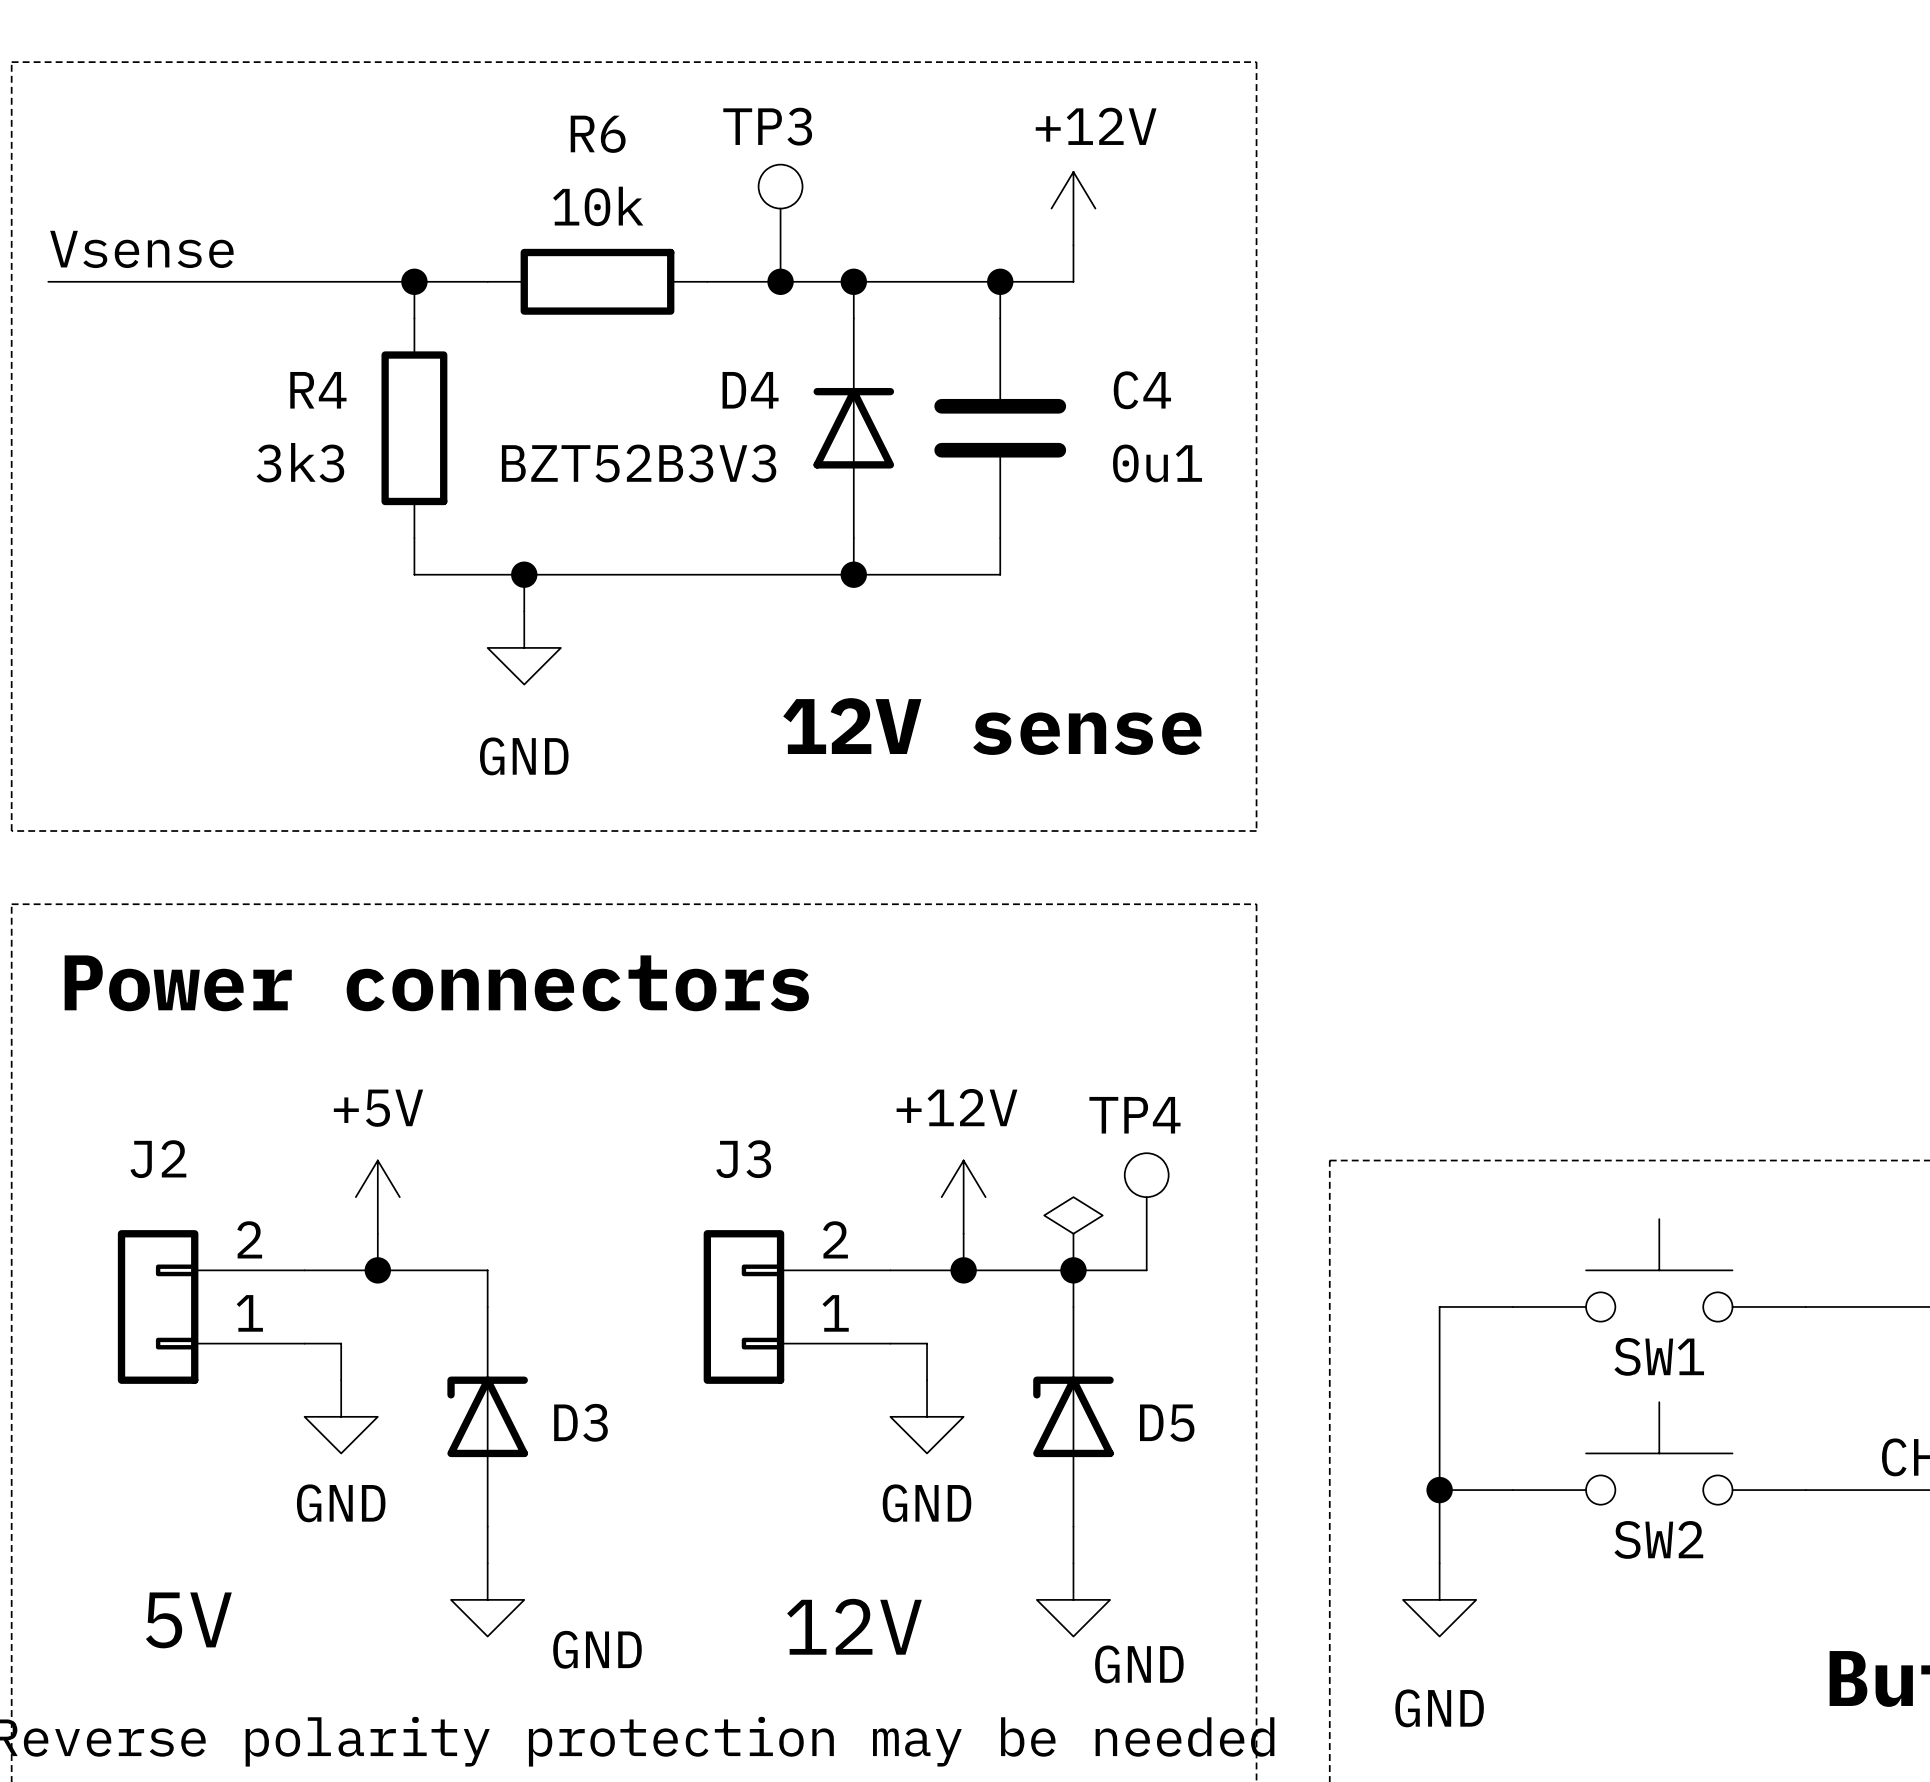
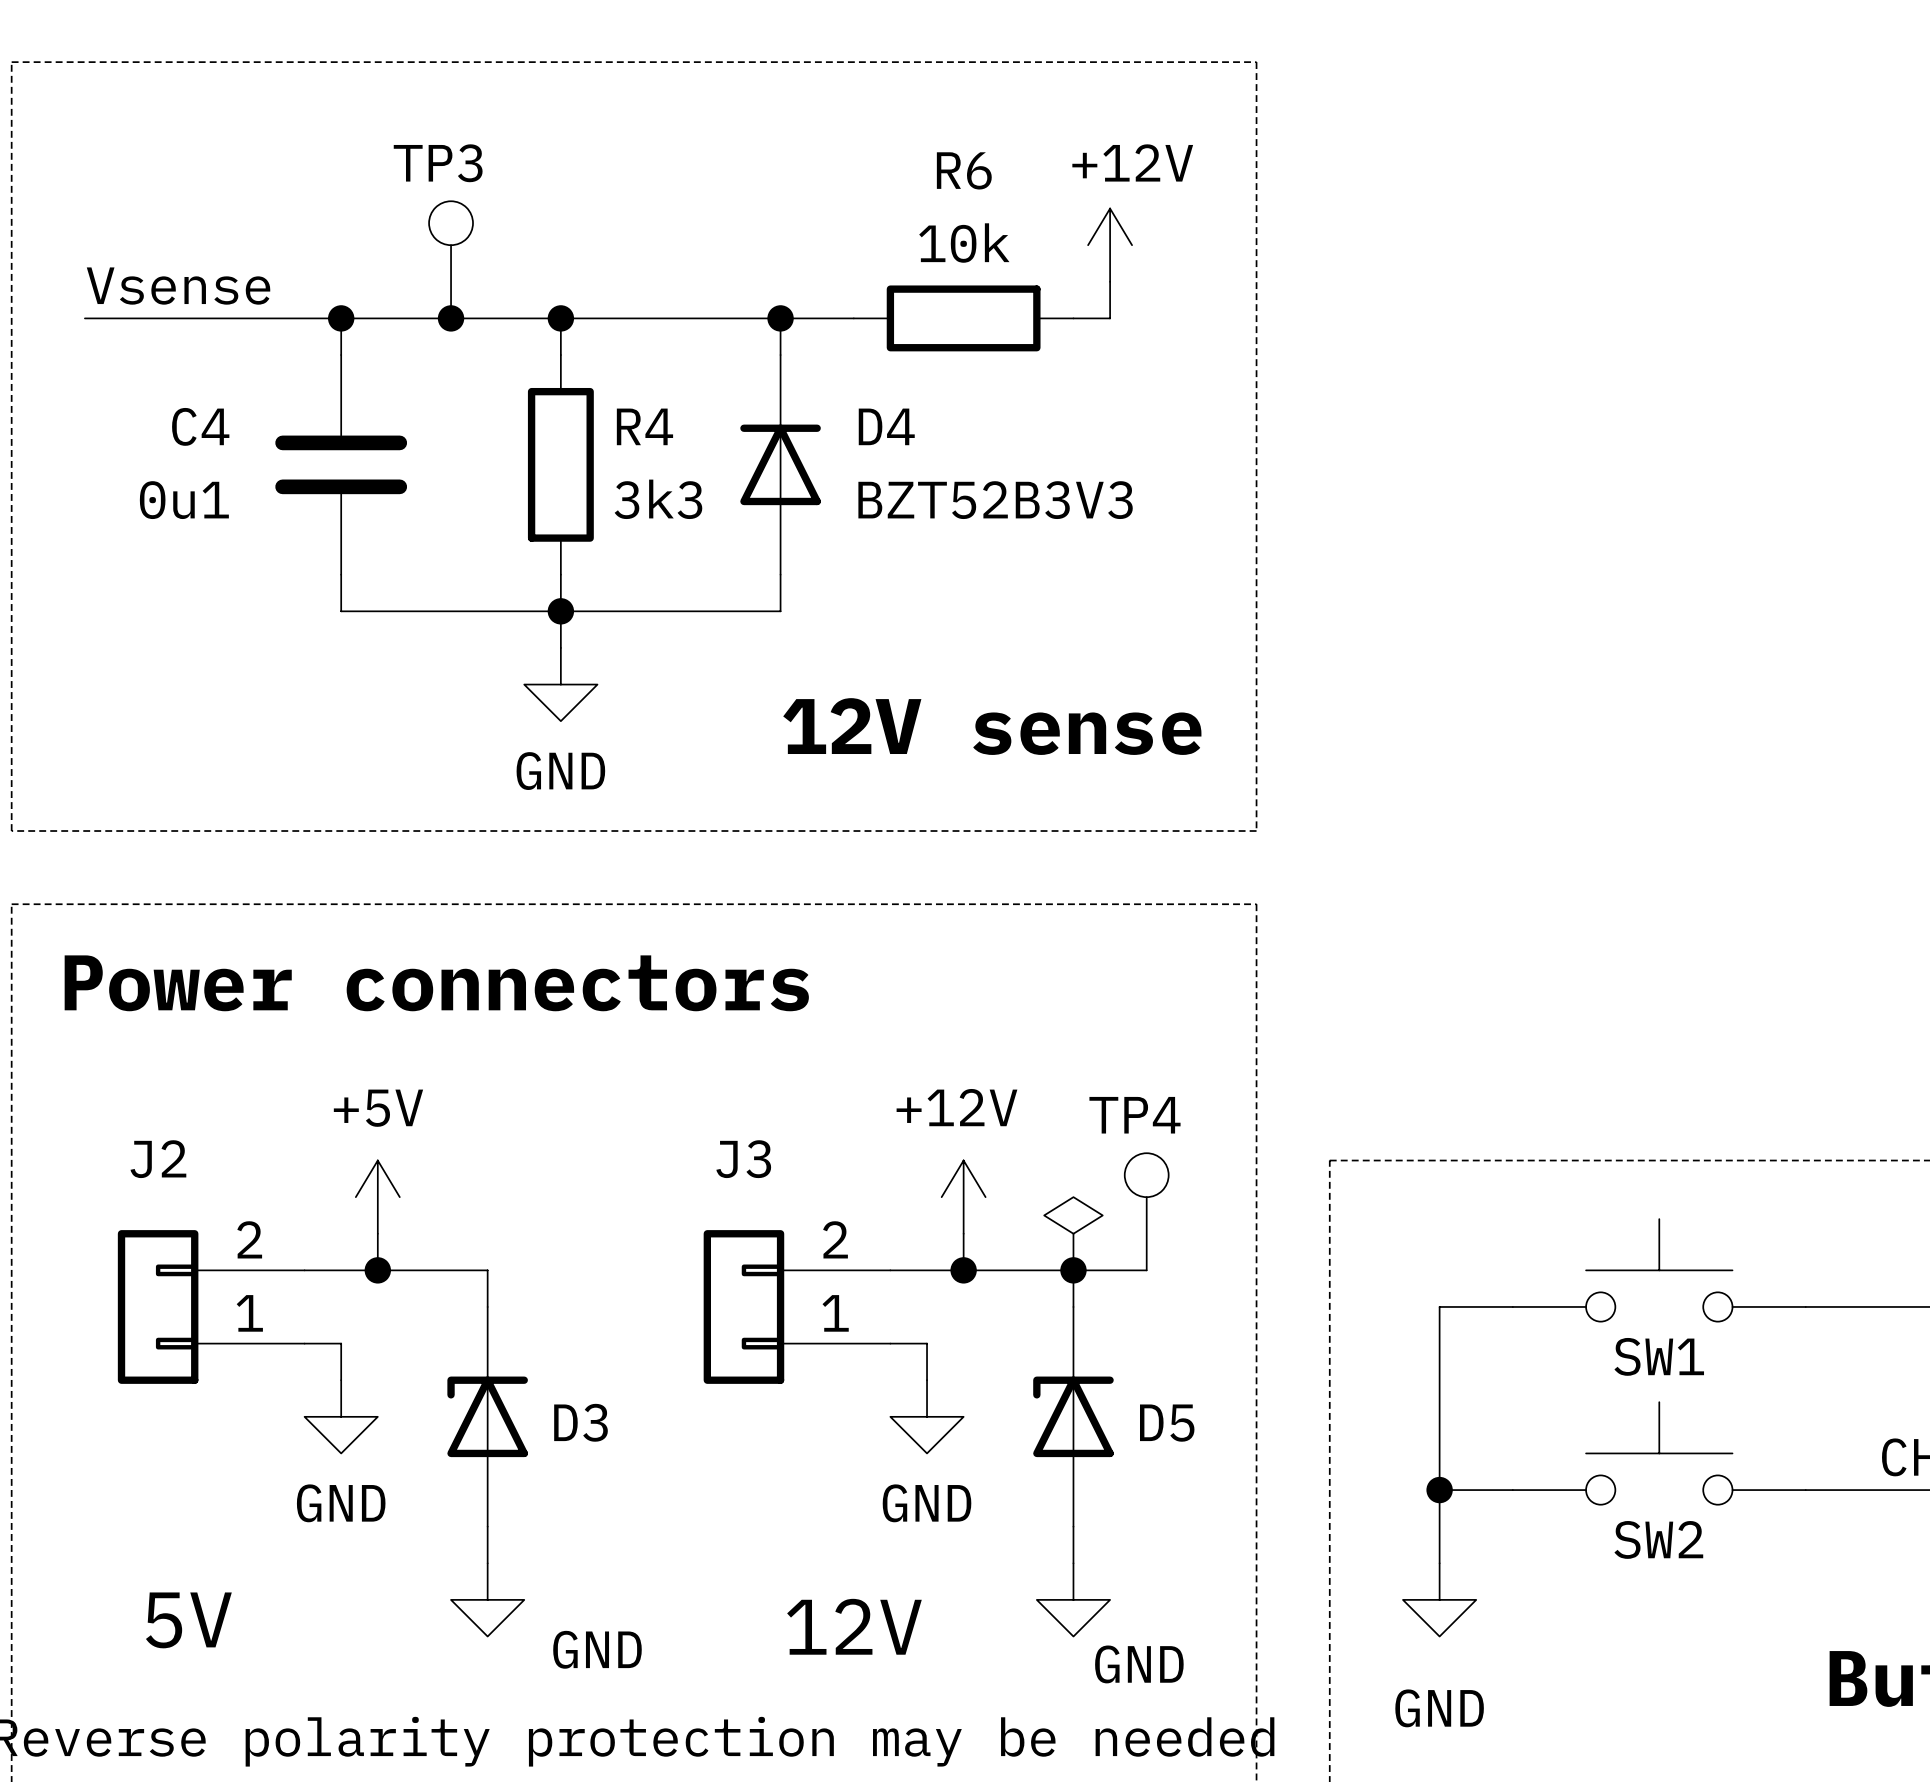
power symbol position: +12V (1073, 208) -> +12V (1110, 245)
TP3 position: (780, 223) -> (451, 259)
wire: (1073, 245) (1073, 281) (707, 281) -> none
label position: Vsense (141, 249) -> Vsense (178, 286)
wire: (48, 281) (487, 281) -> none
wire: (414, 281) (414, 318) -> (341, 318) (341, 355)
junction: (414, 281) -> none
R6 position: (597, 281) -> (963, 318)
junction position: (780, 281) -> (780, 318)
wire: (853, 281) (853, 318) -> (84, 318) (853, 318)
junction: (853, 281) -> none
wire: (1000, 281) (1000, 318) -> (780, 318) (780, 355)
junction: (1000, 281) -> none
wire: none -> (1110, 281) (1110, 318) (1073, 318)
junction: none -> (341, 318)
junction: none -> (451, 318)
junction: none -> (560, 318)
R4 name position: R4 (318, 390) -> R4 (644, 426)
D4 name position: D4 (750, 390) -> D4 (886, 426)
C4 name position: C4 (1142, 390) -> C4 (200, 426)
R4 position: (414, 428) -> (560, 464)
D4 position: (853, 428) -> (780, 464)
C4 position: (1000, 428) -> (341, 464)
R4 value position: 3k3 (300, 462) -> 3k3 (658, 499)
D4 value position: BZT52B3V3 (639, 463) -> BZT52B3V3 (995, 500)
C4 value position: 0u1 (1157, 463) -> 0u1 (184, 500)
wire: (414, 538) (414, 574) (1000, 574) (1000, 538) -> none
wire: (853, 538) (853, 574) -> none
wire: none -> (341, 574) (341, 611) (780, 611) (780, 574)
wire: (524, 574) (524, 611) -> (560, 318) (560, 355)
junction position: (524, 574) -> (560, 611)
wire: none -> (560, 574) (560, 647)
junction: (853, 574) -> none
power symbol position: GND (524, 647) -> GND (560, 684)
power symbol text position: GND (524, 756) -> GND (560, 771)

